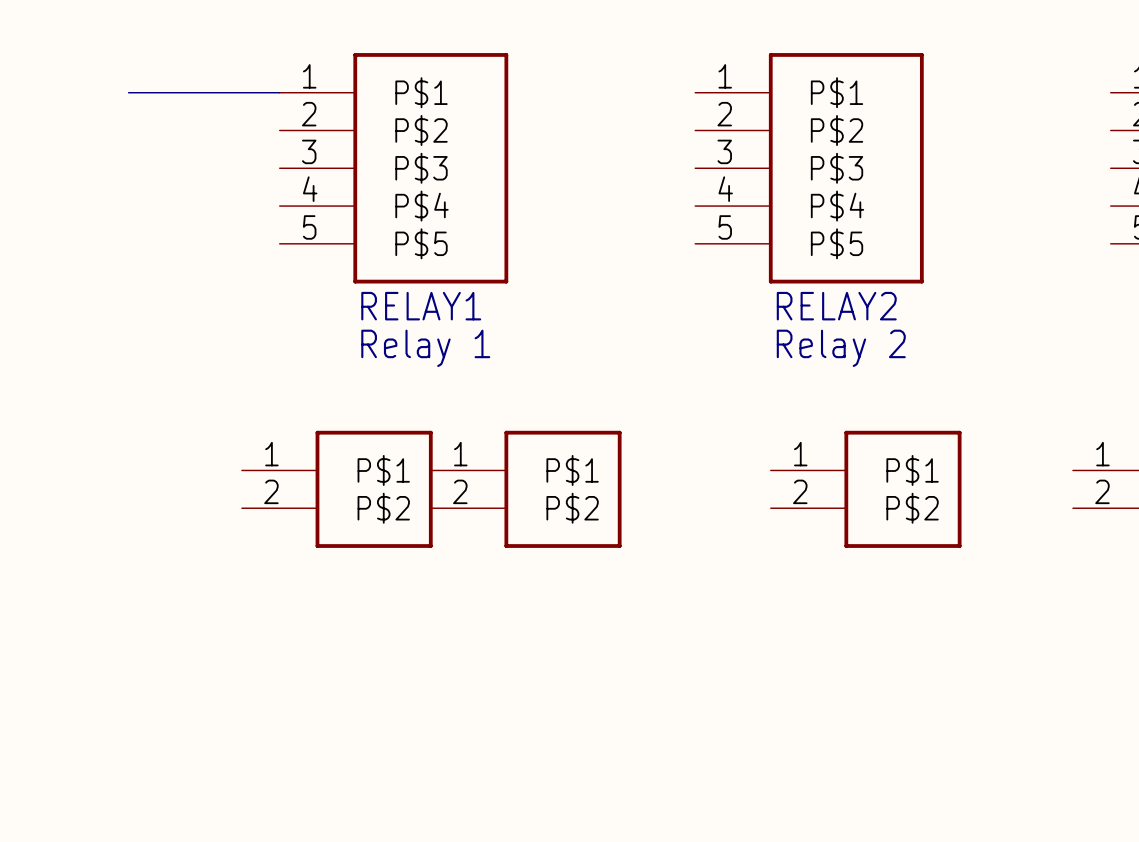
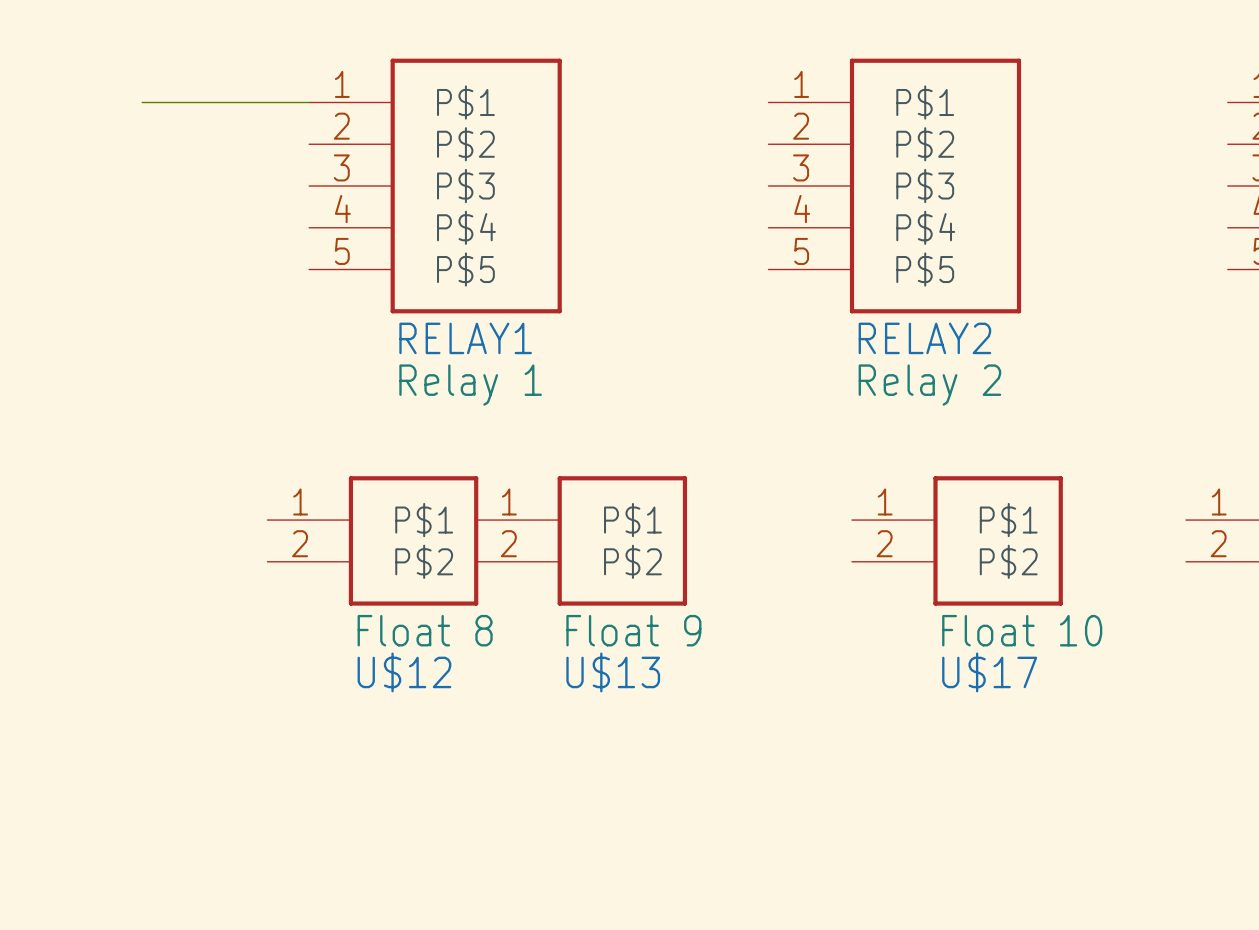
U$12 value: none -> Float 8 (425, 630)
U$13 value: none -> Float 9 (633, 630)
U$17 value: none -> Float 10 (1022, 630)
U$12 name: none -> U$12 (404, 672)
U$13 name: none -> U$13 (613, 672)
U$17 name: none -> U$17 (989, 672)

